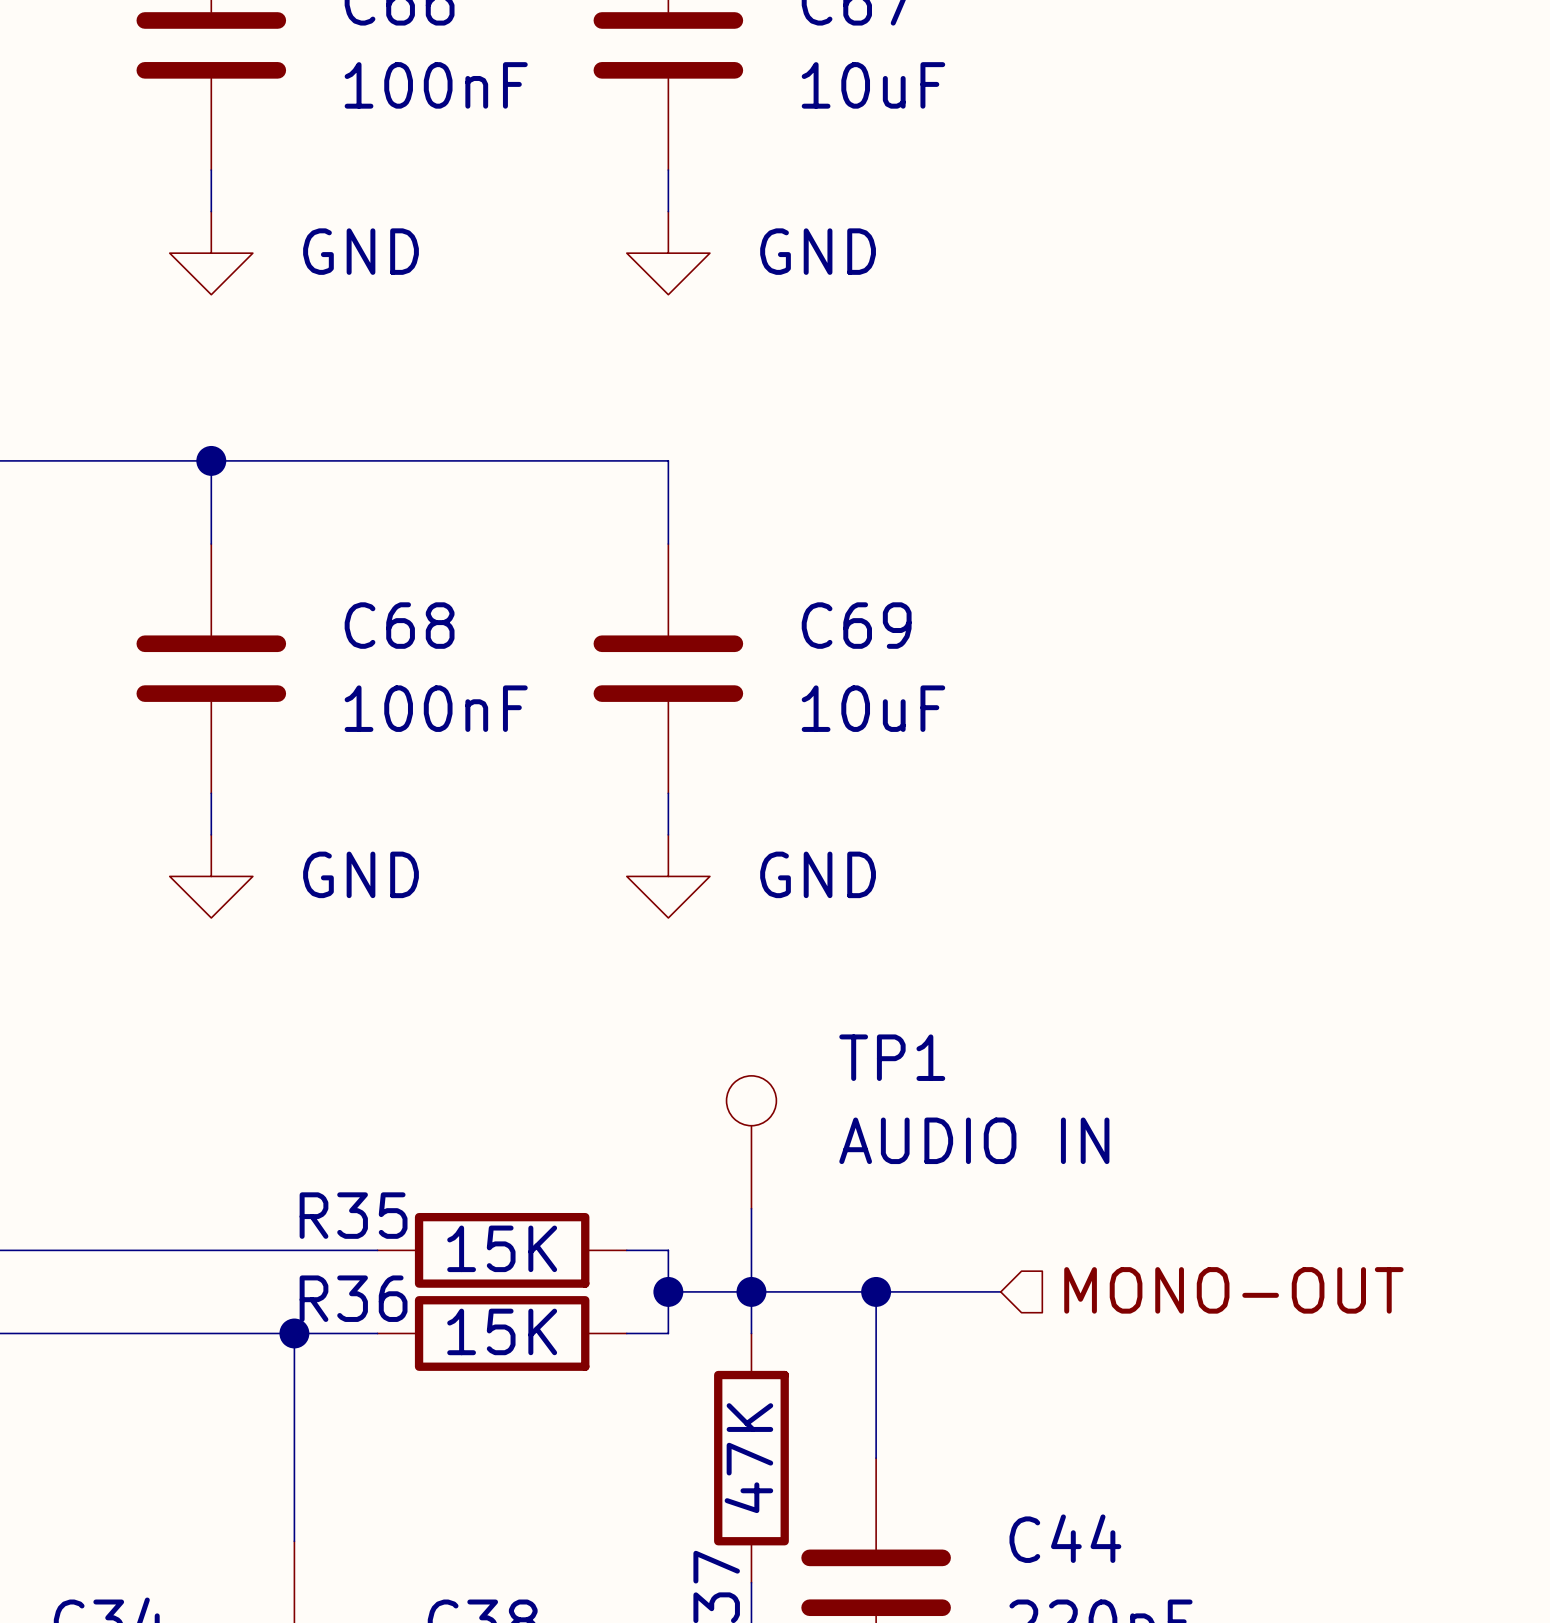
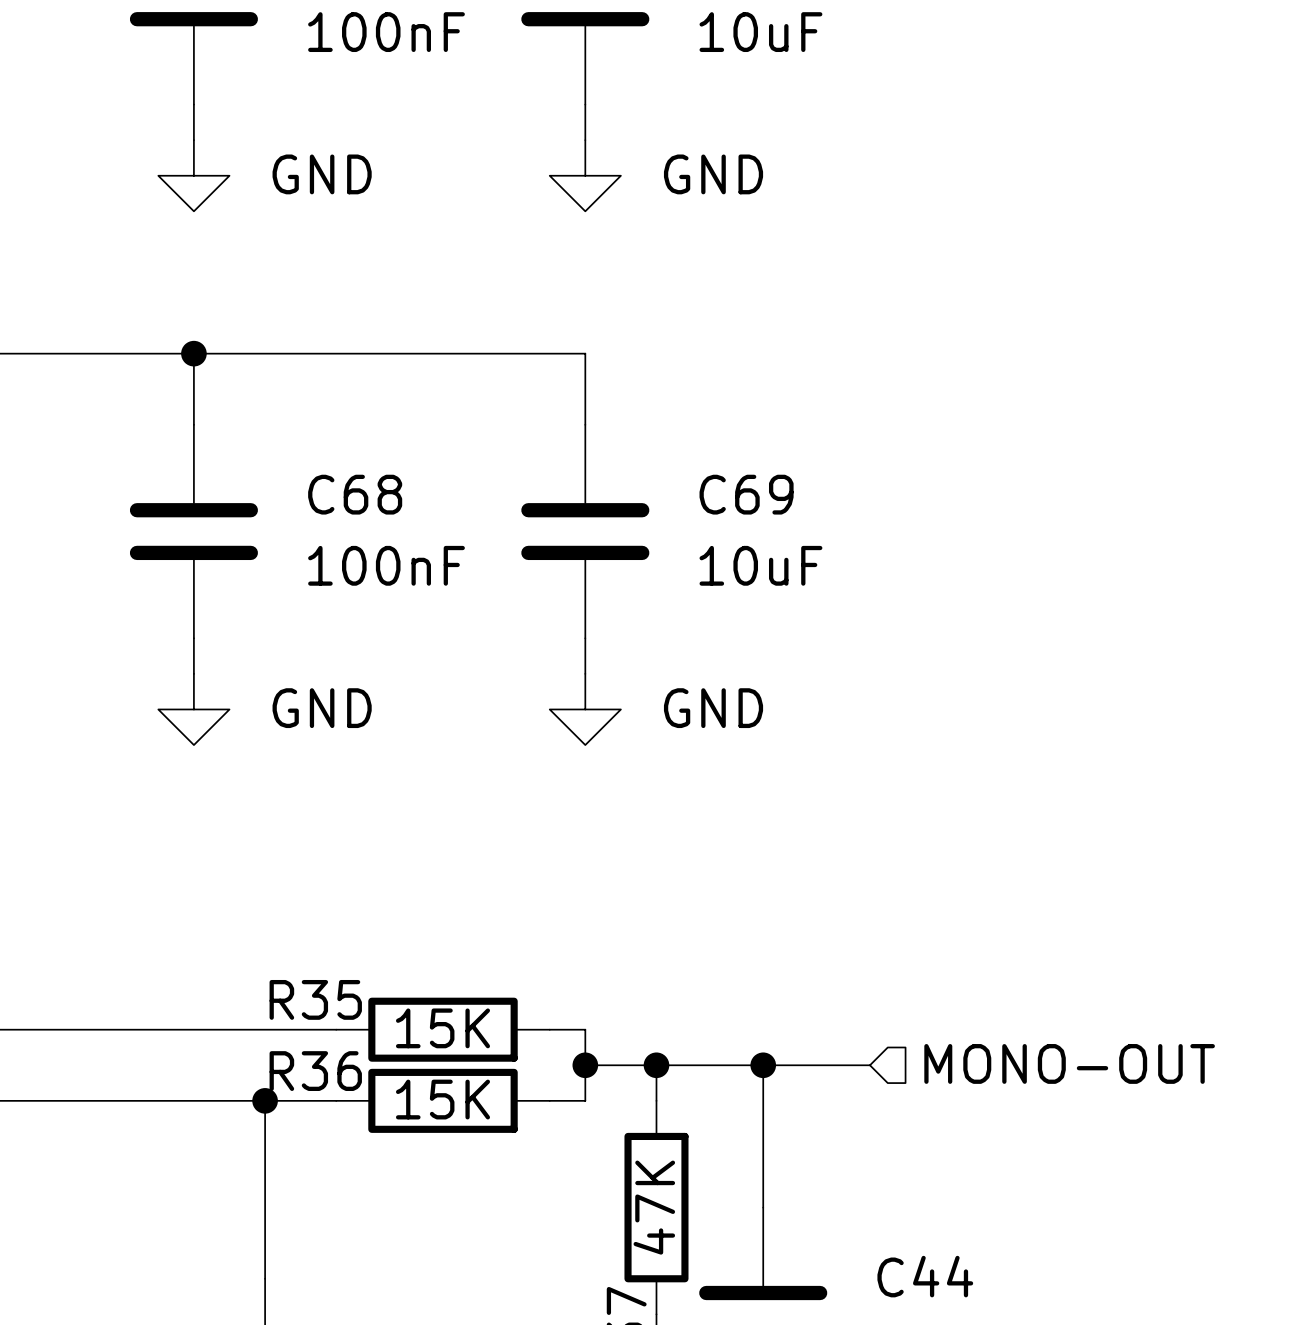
TP1: AUDIO IN (751, 1142) -> none
wire: (751, 1208) (751, 1291) -> none

